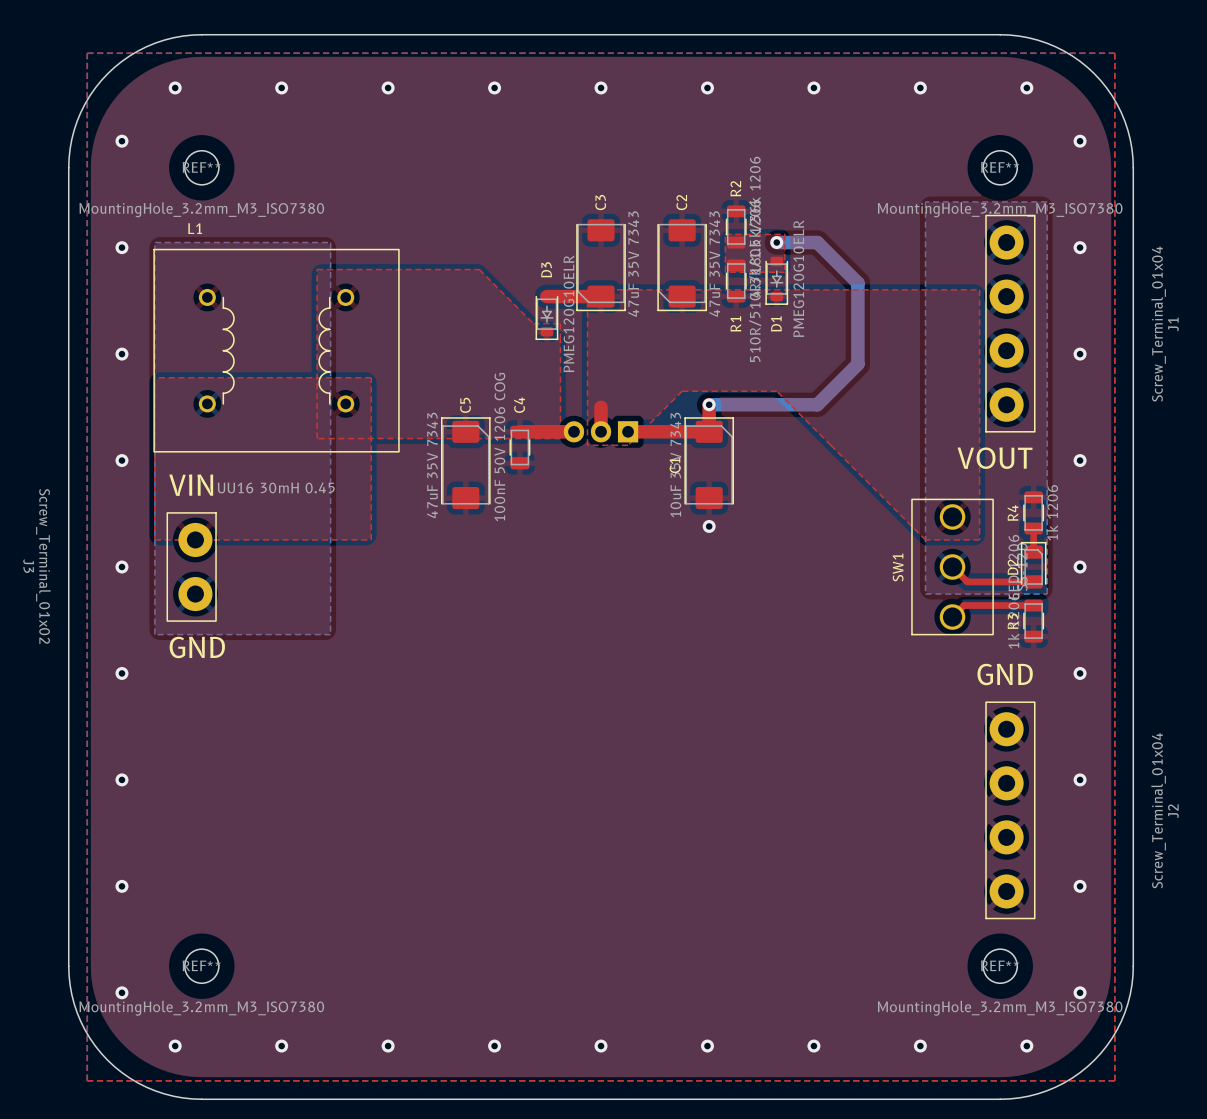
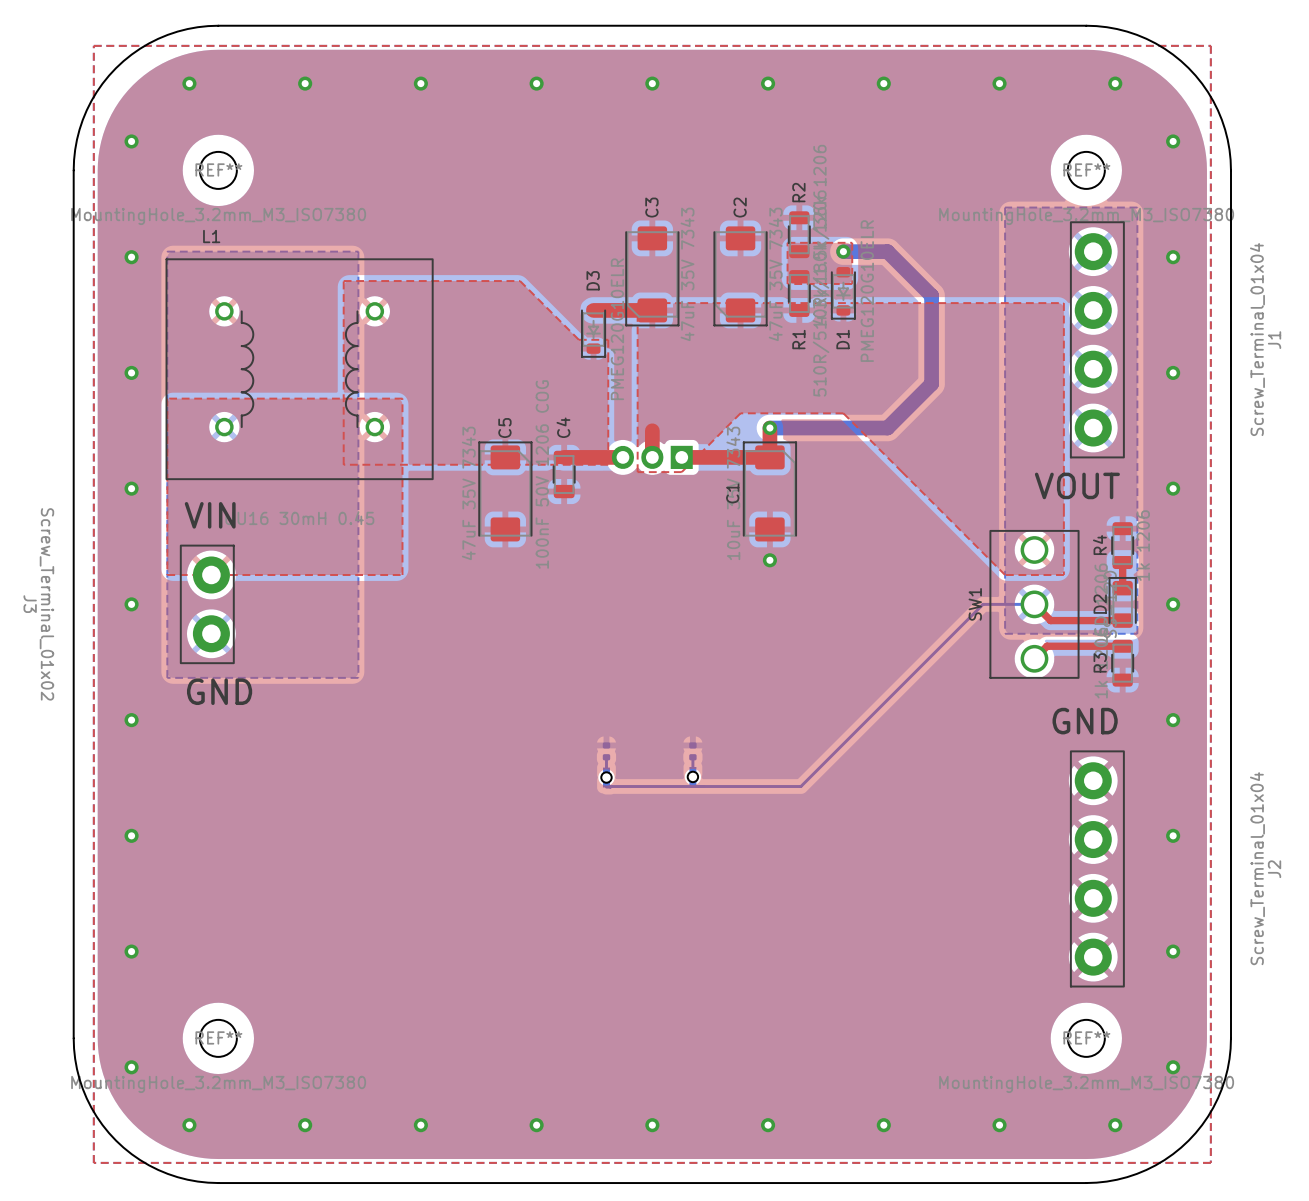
bottom track: none -> (1034, 604) (983, 604) (800, 786) (606, 787)
part: none -> (606, 751)
part: none -> (692, 751)
bottom track: none -> (606, 757) (606, 767)
bottom track: none -> (692, 757) (692, 767)
part: none -> (692, 776)
part: none -> (606, 777)

